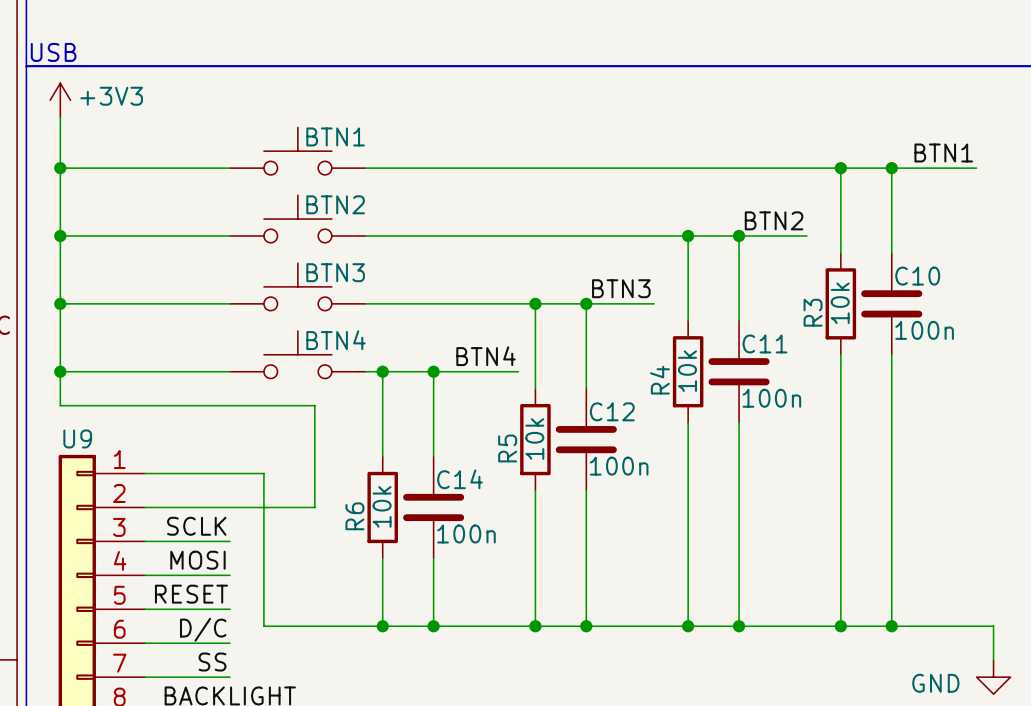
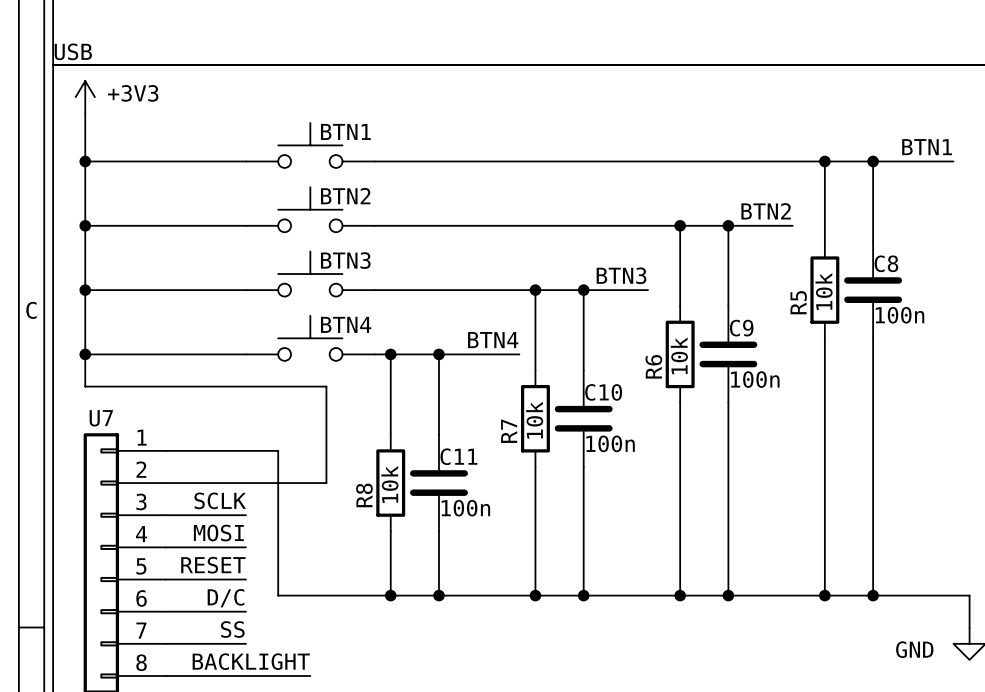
C10 name: C10 (917, 276) -> C8 (886, 263)
R3 name: R3 (813, 312) -> R5 (798, 302)
C11 name: C11 (765, 343) -> C9 (741, 328)
R4 name: R4 (659, 380) -> R6 (653, 366)
C12 name: C12 (612, 411) -> C10 (603, 392)
U9 name: U9 (77, 438) -> U7 (101, 418)
R5 name: R5 (507, 448) -> R7 (509, 431)
C14 name: C14 (460, 479) -> C11 (458, 456)
R6 name: R6 (354, 516) -> R8 (364, 495)

